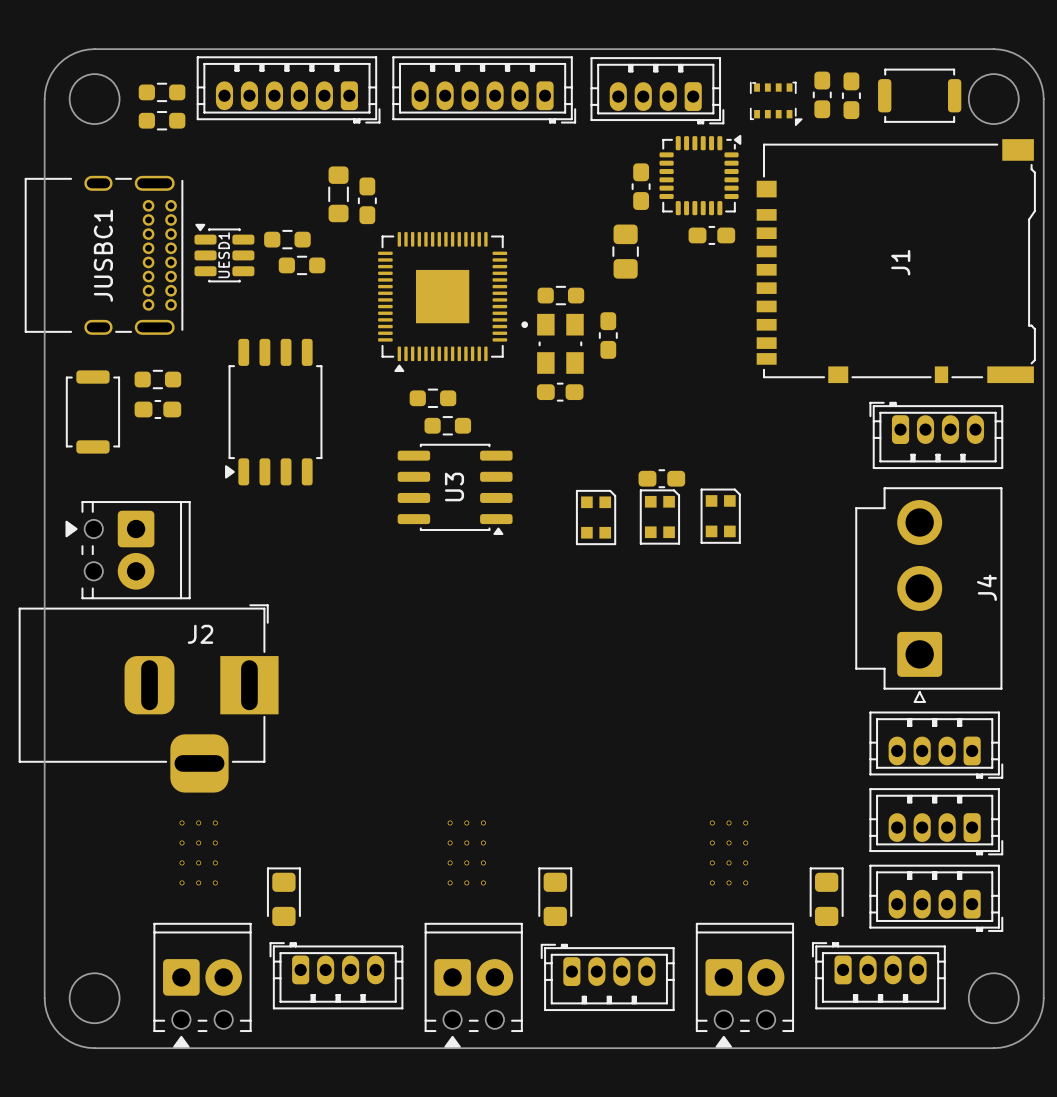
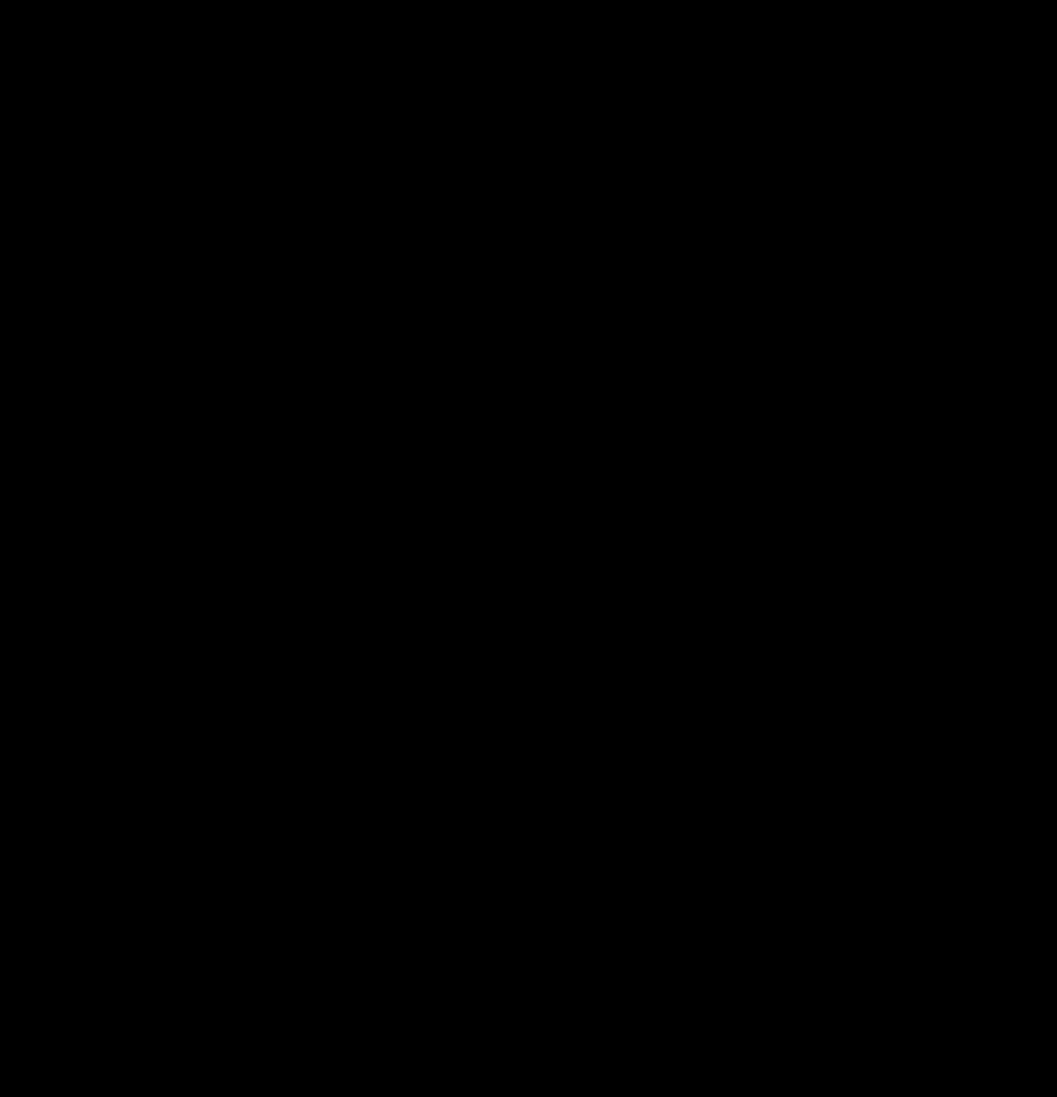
board edge: (94, 49) (993, 49) (1012, 52) (1029, 63) (1039, 79) (1043, 99) (1043, 998) (1039, 1017) (1029, 1033) (1012, 1044) (993, 1048) (94, 1048) (75, 1044) (59, 1033) (48, 1017) (44, 998) (44, 99) (48, 79) (59, 63) (75, 52) (94, 49) -> none
round board edge: [69, 73, 121, 125] -> none
round board edge: [968, 73, 1020, 125] -> none
part: (288, 89) -> none
part: (484, 89) -> none
part: (657, 90) -> none
part: (162, 92) -> none
part: (822, 94) -> none
part: (851, 95) -> none
part: (919, 95) -> none
part: (776, 103) -> none
part: (162, 120) -> none
part: (700, 175) -> none
part: (641, 186) -> none
part: (338, 194) -> none
part: (367, 200) -> none
part: (711, 235) -> none
part: (287, 239) -> none
part: (625, 251) -> none
UESD1: (224, 253) -> none
JUSBC1: (104, 255) -> none
J1: (896, 261) -> none
part: (302, 265) -> none
part: (560, 295) -> none
part: (442, 302) -> none
part: (608, 335) -> none
part: (552, 343) -> none
part: (157, 379) -> none
part: (560, 392) -> none
part: (432, 398) -> none
part: (157, 409) -> none
part: (92, 411) -> none
part: (273, 412) -> none
part: (447, 425) -> none
part: (936, 435) -> none
part: (661, 478) -> none
U3: (455, 489) -> none
part: (720, 516) -> none
part: (596, 517) -> none
part: (659, 517) -> none
part: (128, 550) -> none
J4: (928, 595) -> none
J2: (148, 698) -> none
part: (936, 745) -> none
part: (936, 821) -> none
part: (198, 852) -> none
part: (466, 852) -> none
part: (729, 852) -> none
part: (283, 896) -> none
part: (555, 896) -> none
part: (826, 896) -> none
part: (936, 898) -> none
round board edge: [69, 972, 121, 1024] -> none
round board edge: [968, 972, 1020, 1024] -> none
part: (336, 975) -> none
part: (878, 975) -> none
part: (607, 977) -> none
part: (202, 985) -> none
part: (473, 985) -> none
part: (744, 985) -> none

